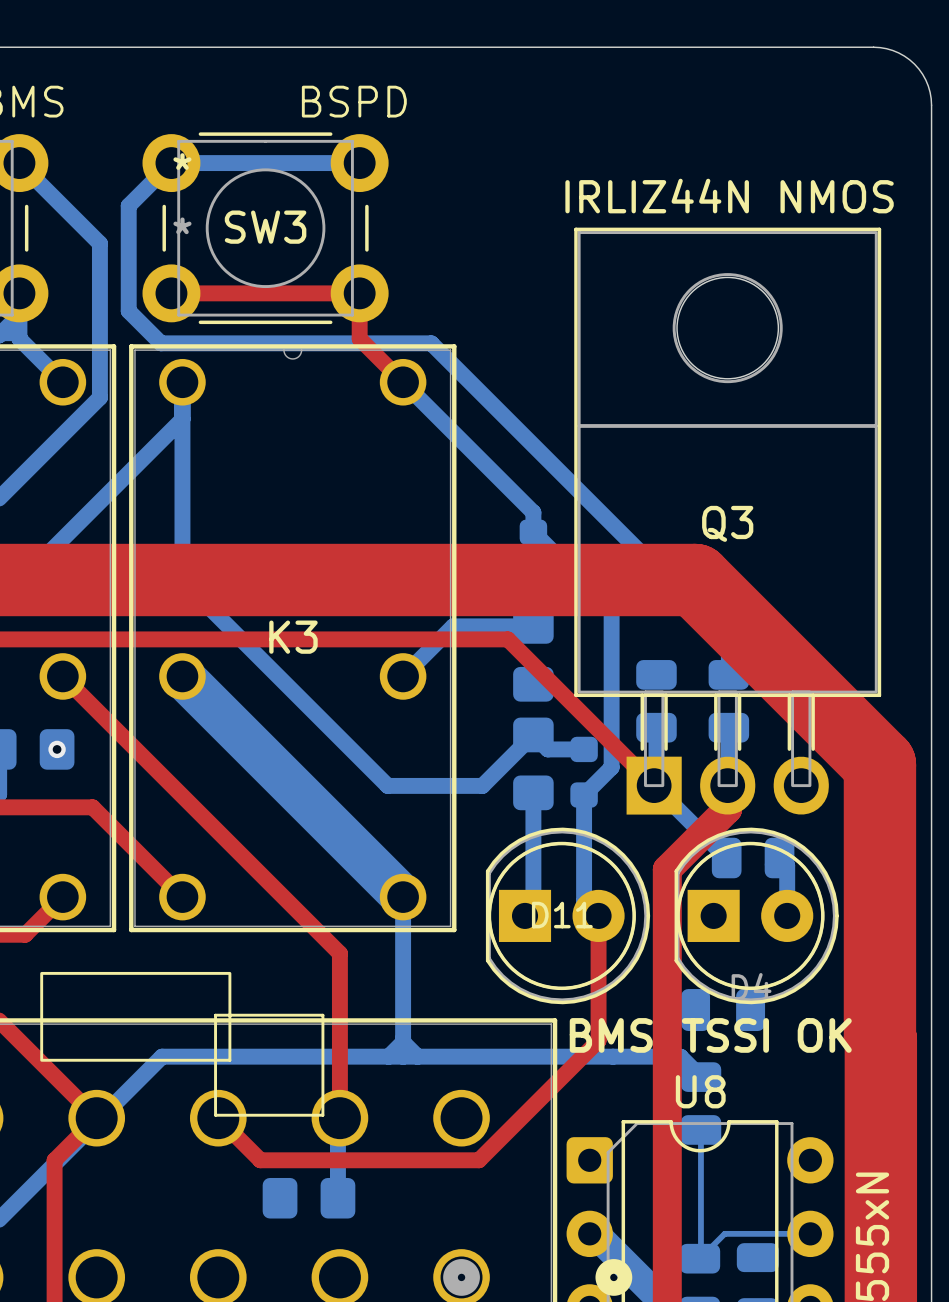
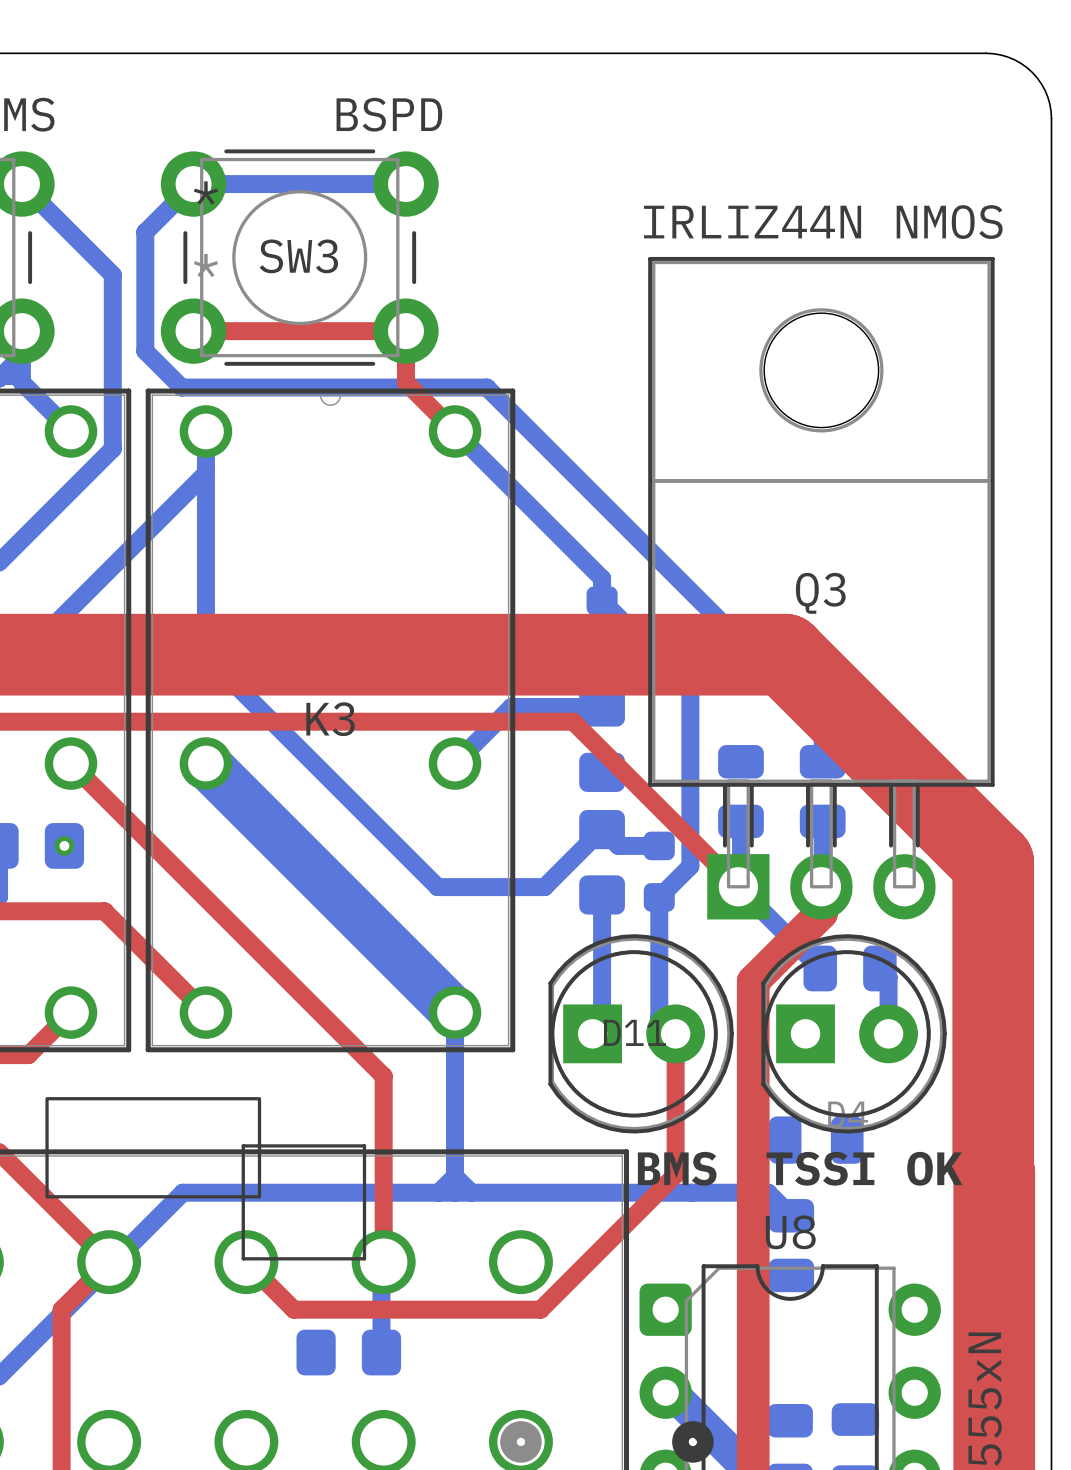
bottom track: (700, 1129) (700, 1257) -> none
bottom track: (815, 1233) (724, 1233) (699, 1258) -> none

